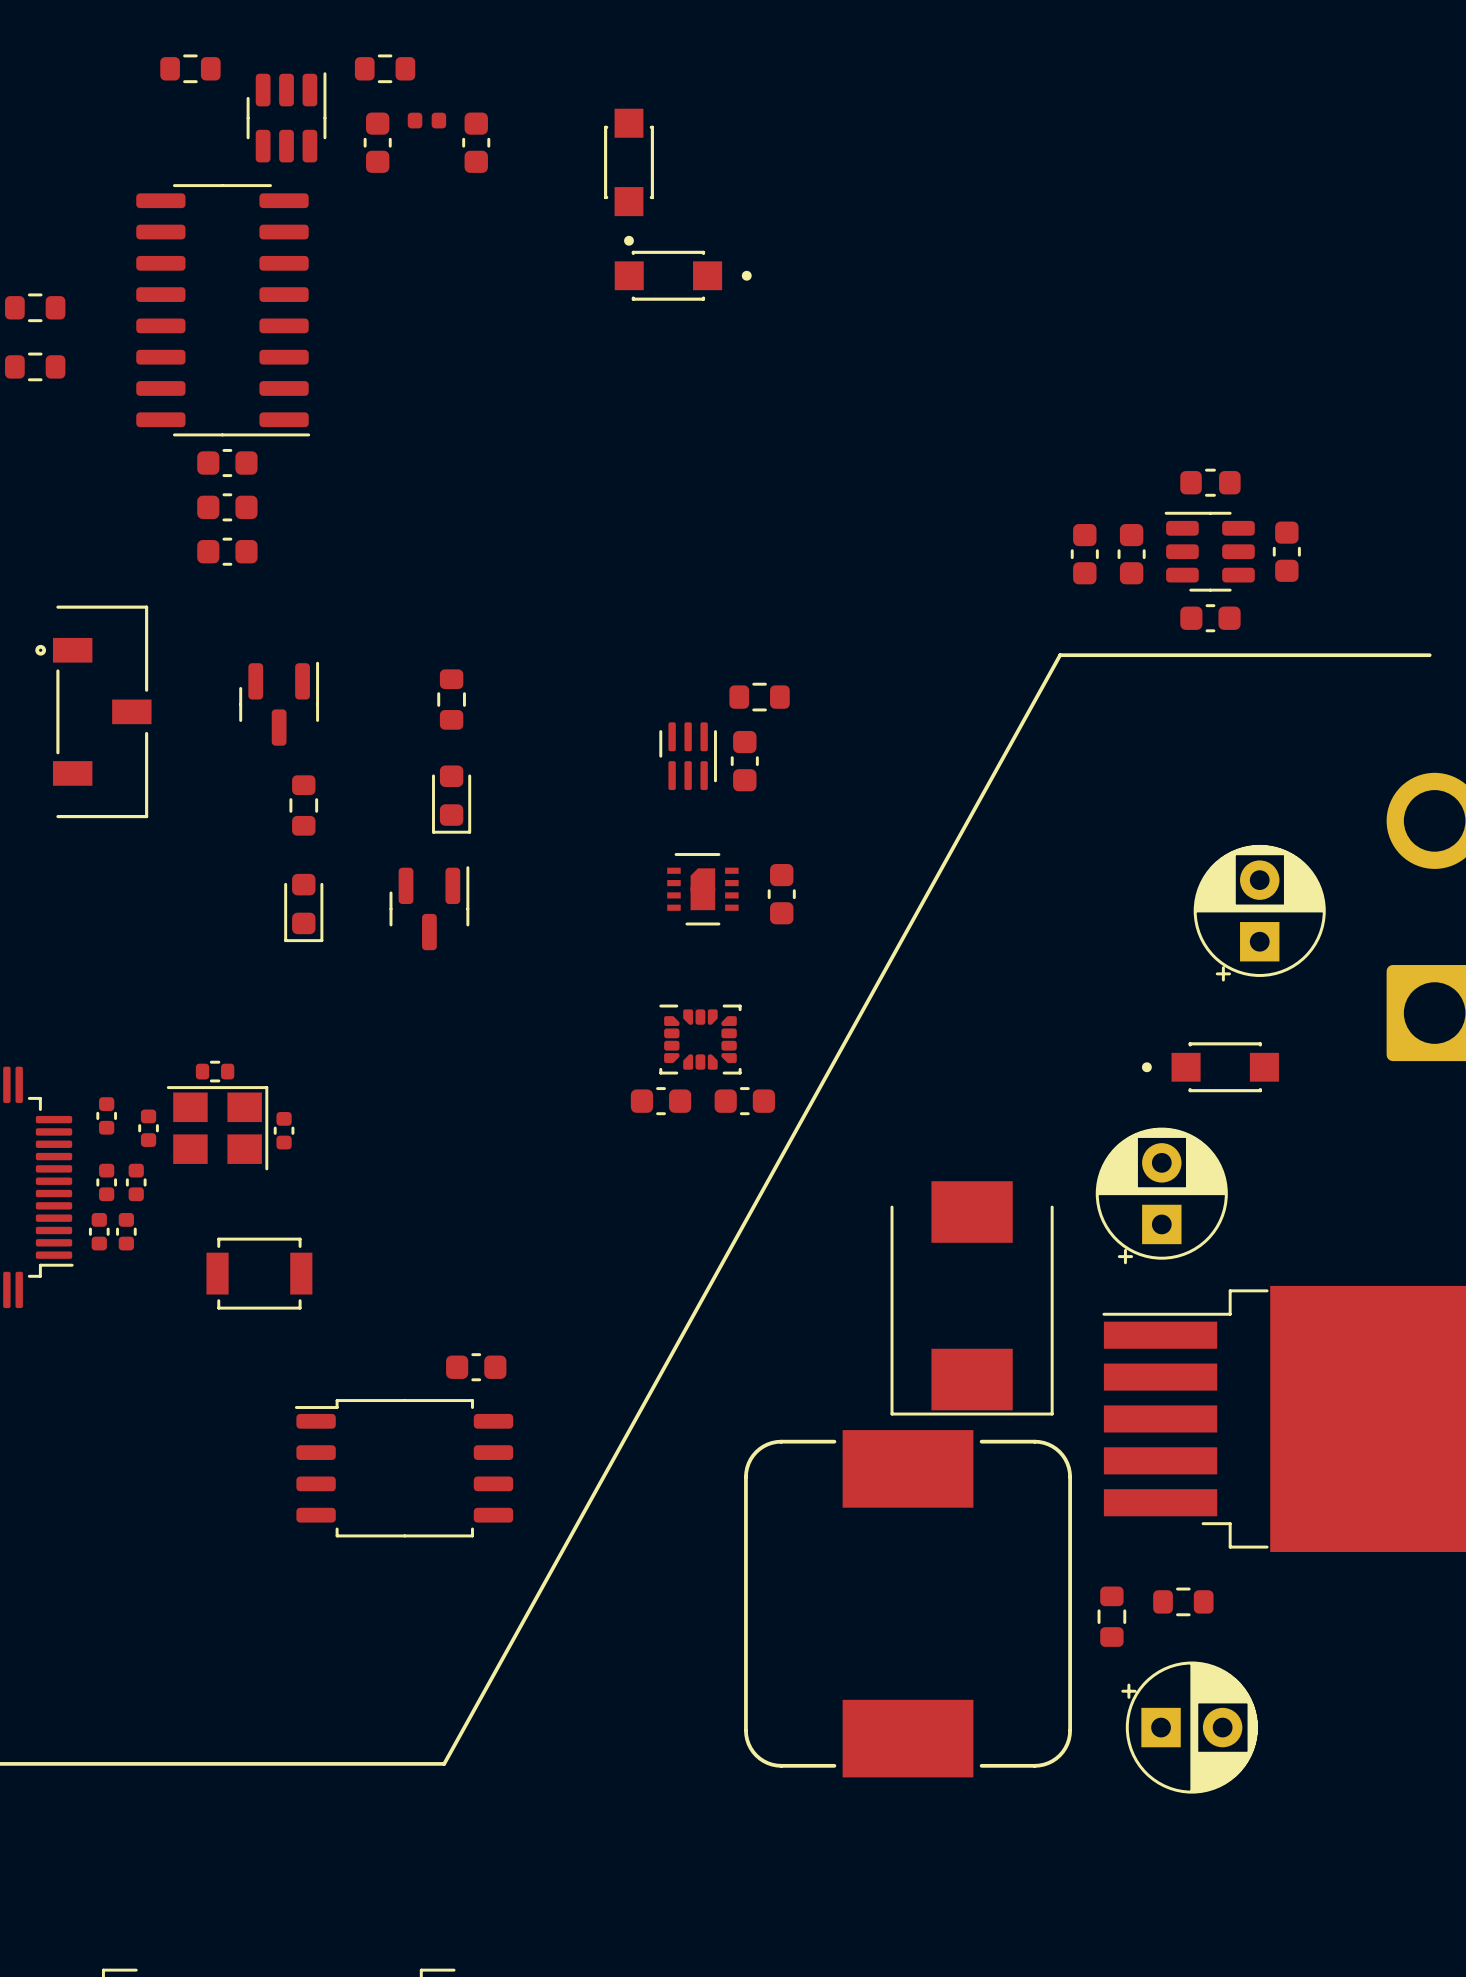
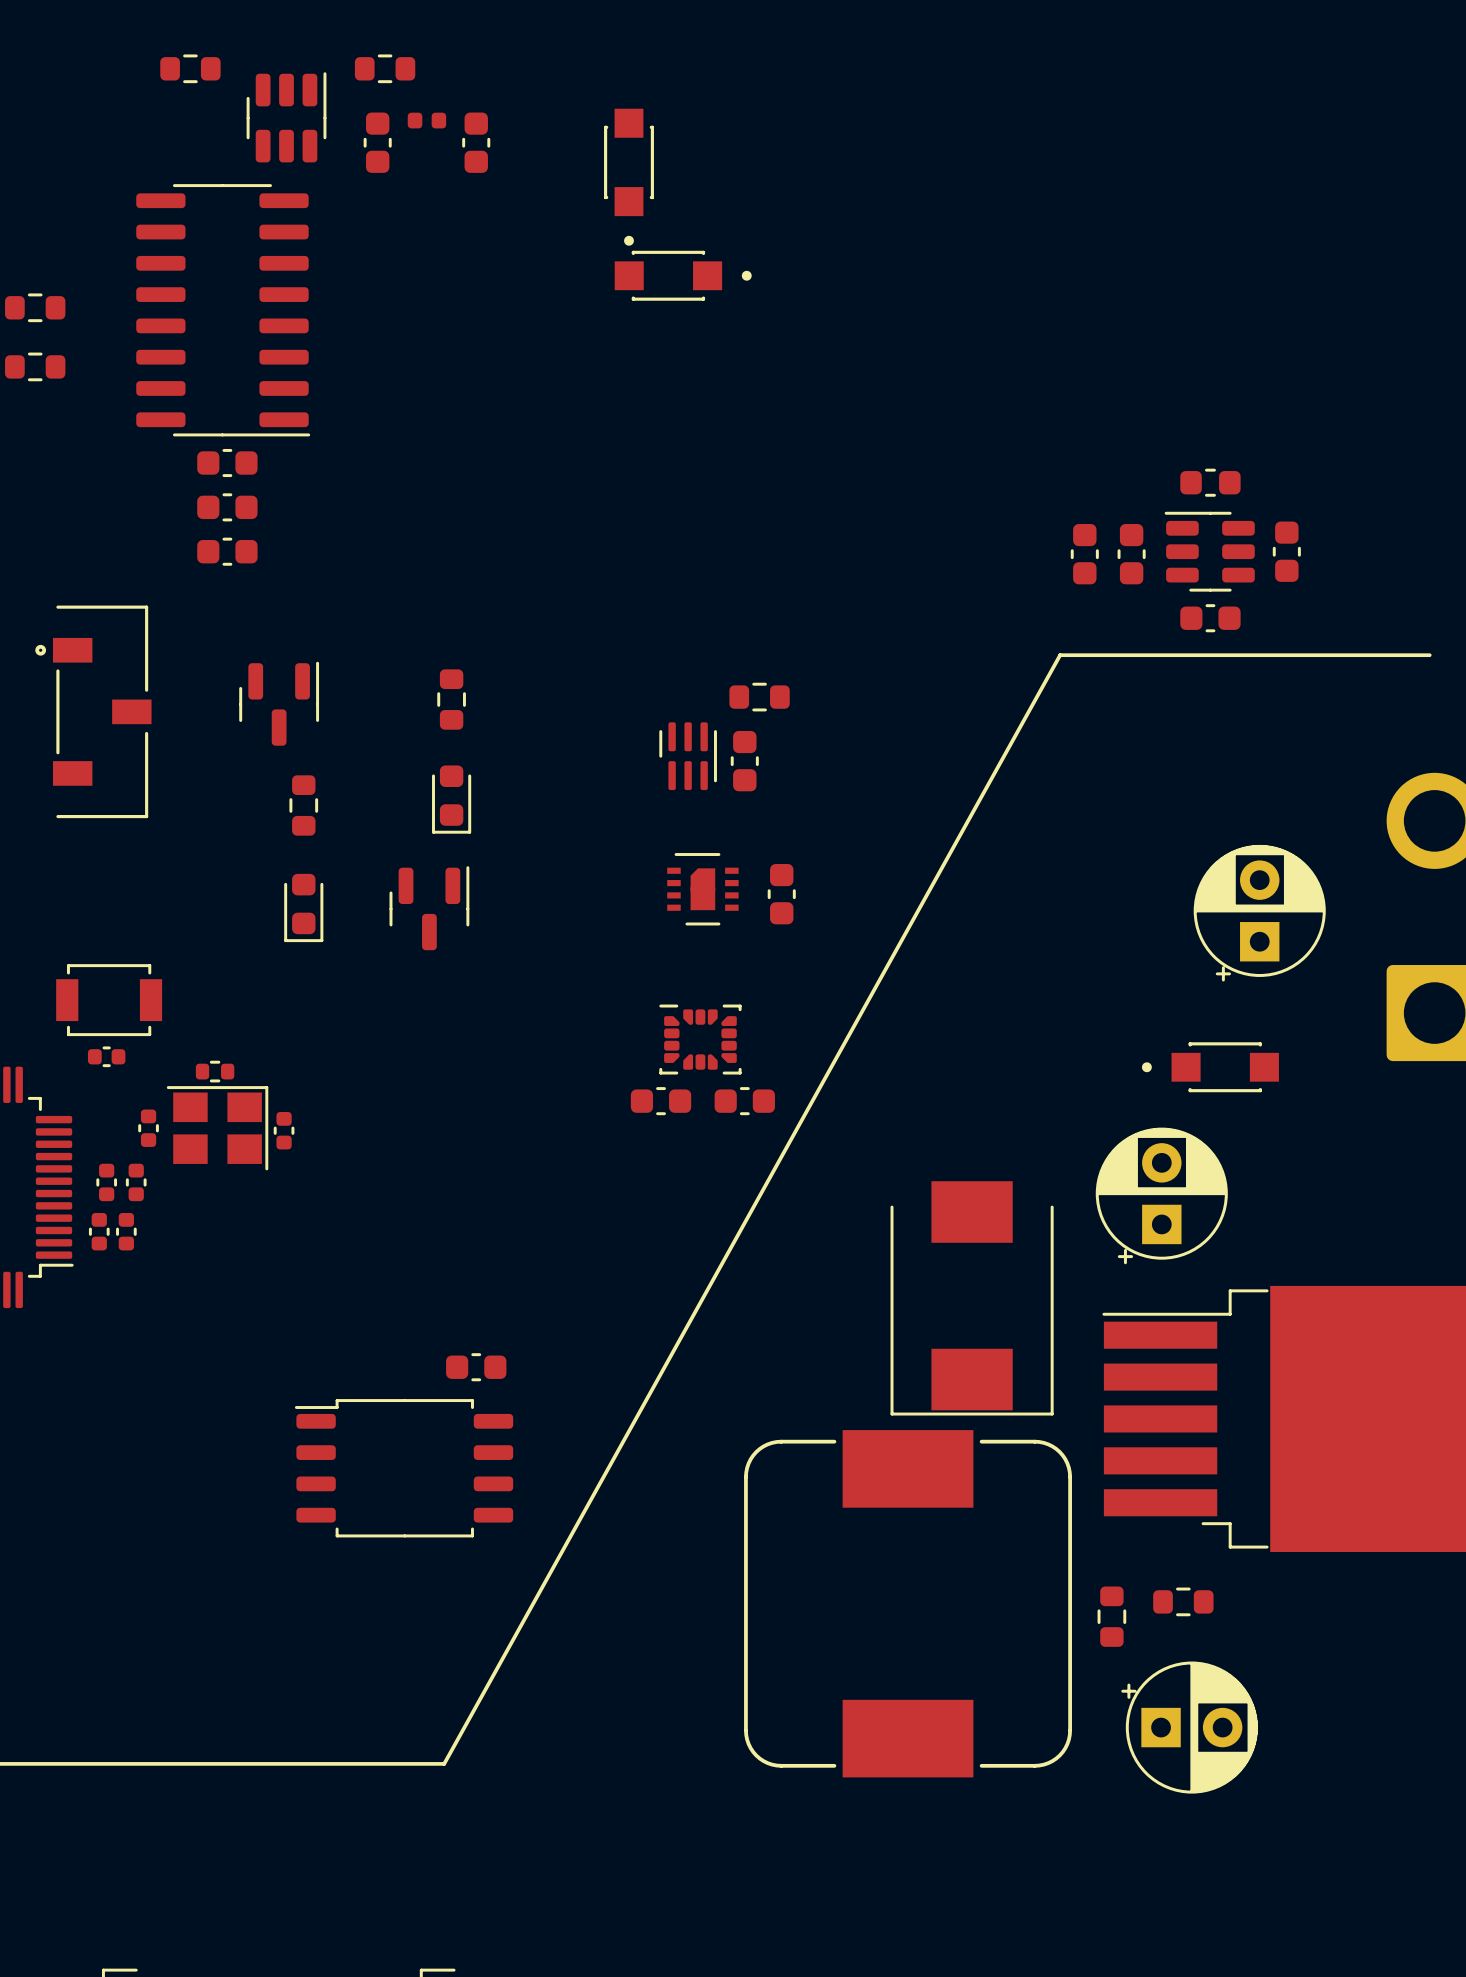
part rotation: 0° (106, 1115) -> 90° clockwise (106, 1056)
part position: (106, 1115) -> (106, 1056)
part position: (259, 1273) -> (109, 1000)

